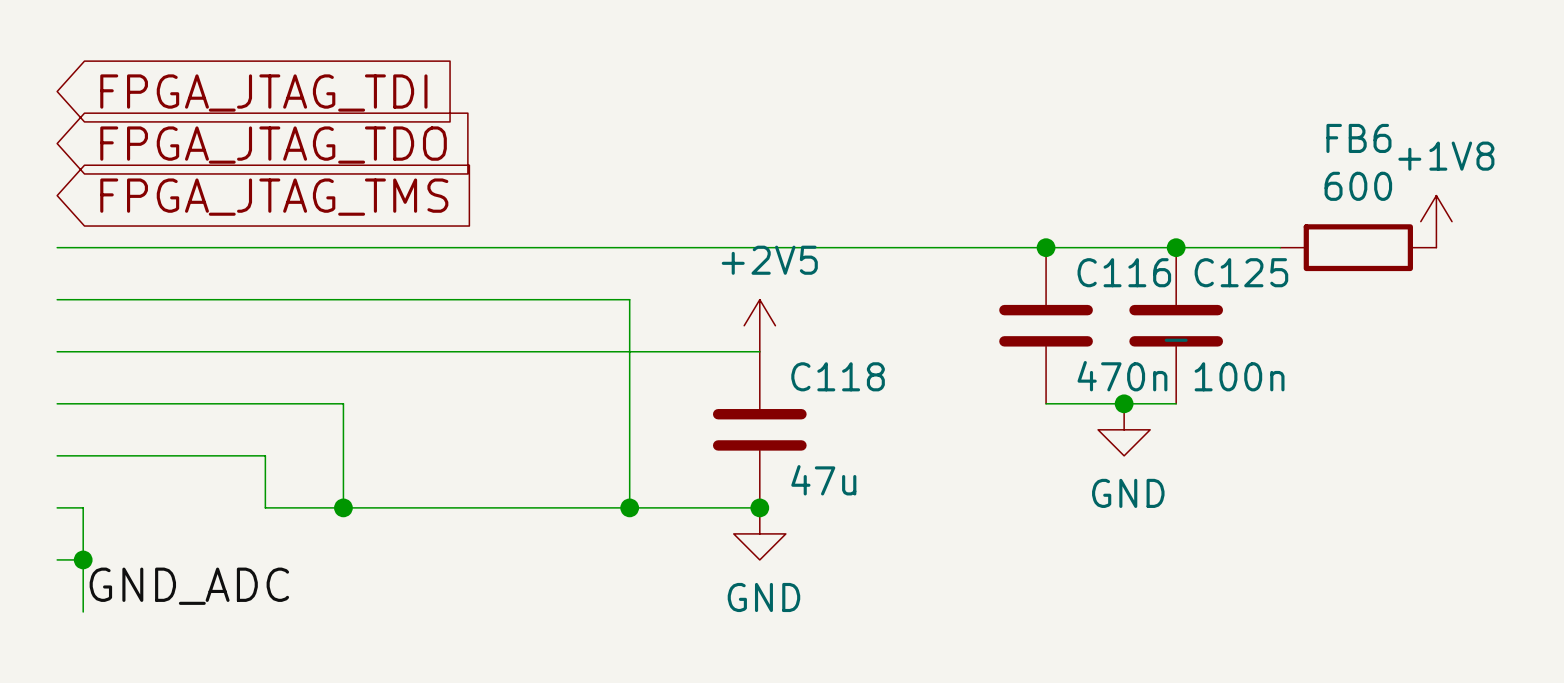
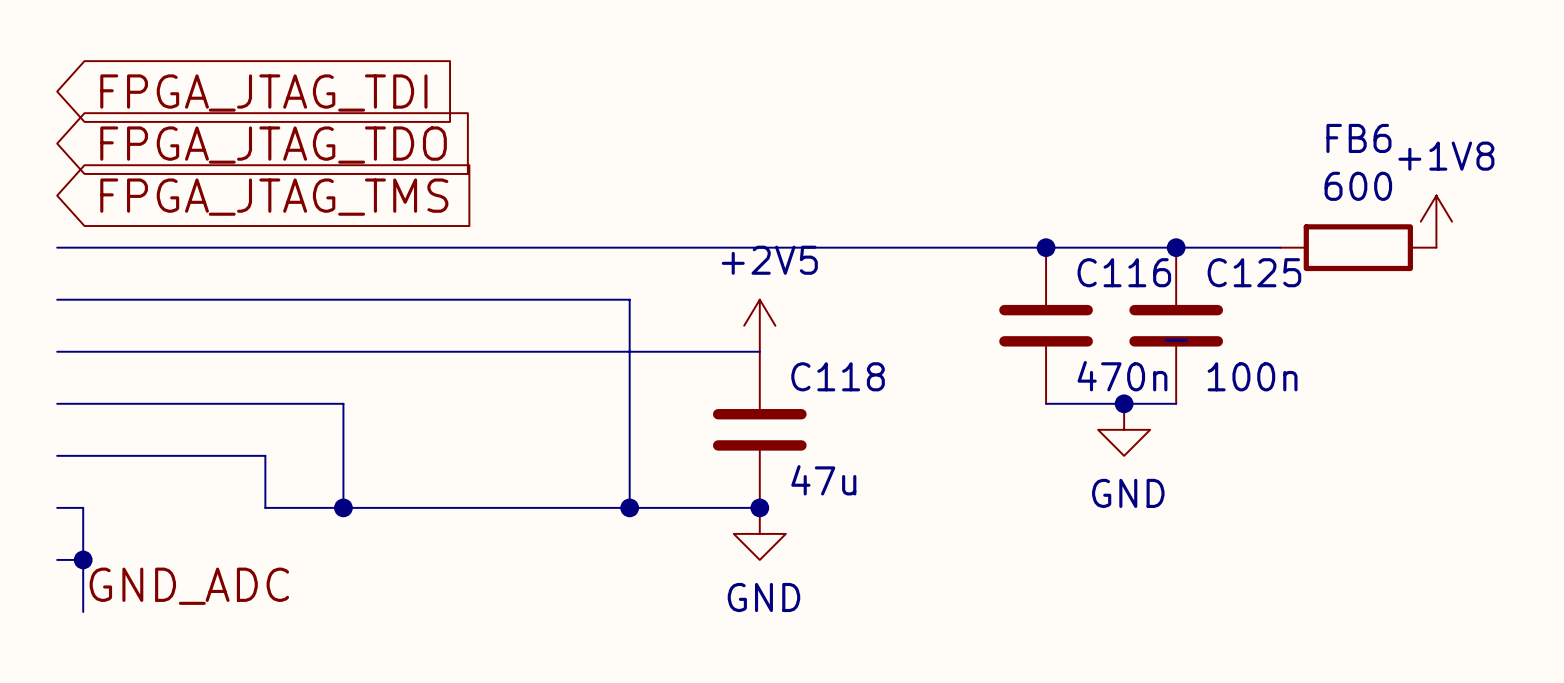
C125 name position: C125 (1241, 272) -> C125 (1254, 272)
C125 value position: 100n (1239, 376) -> 100n (1252, 376)

